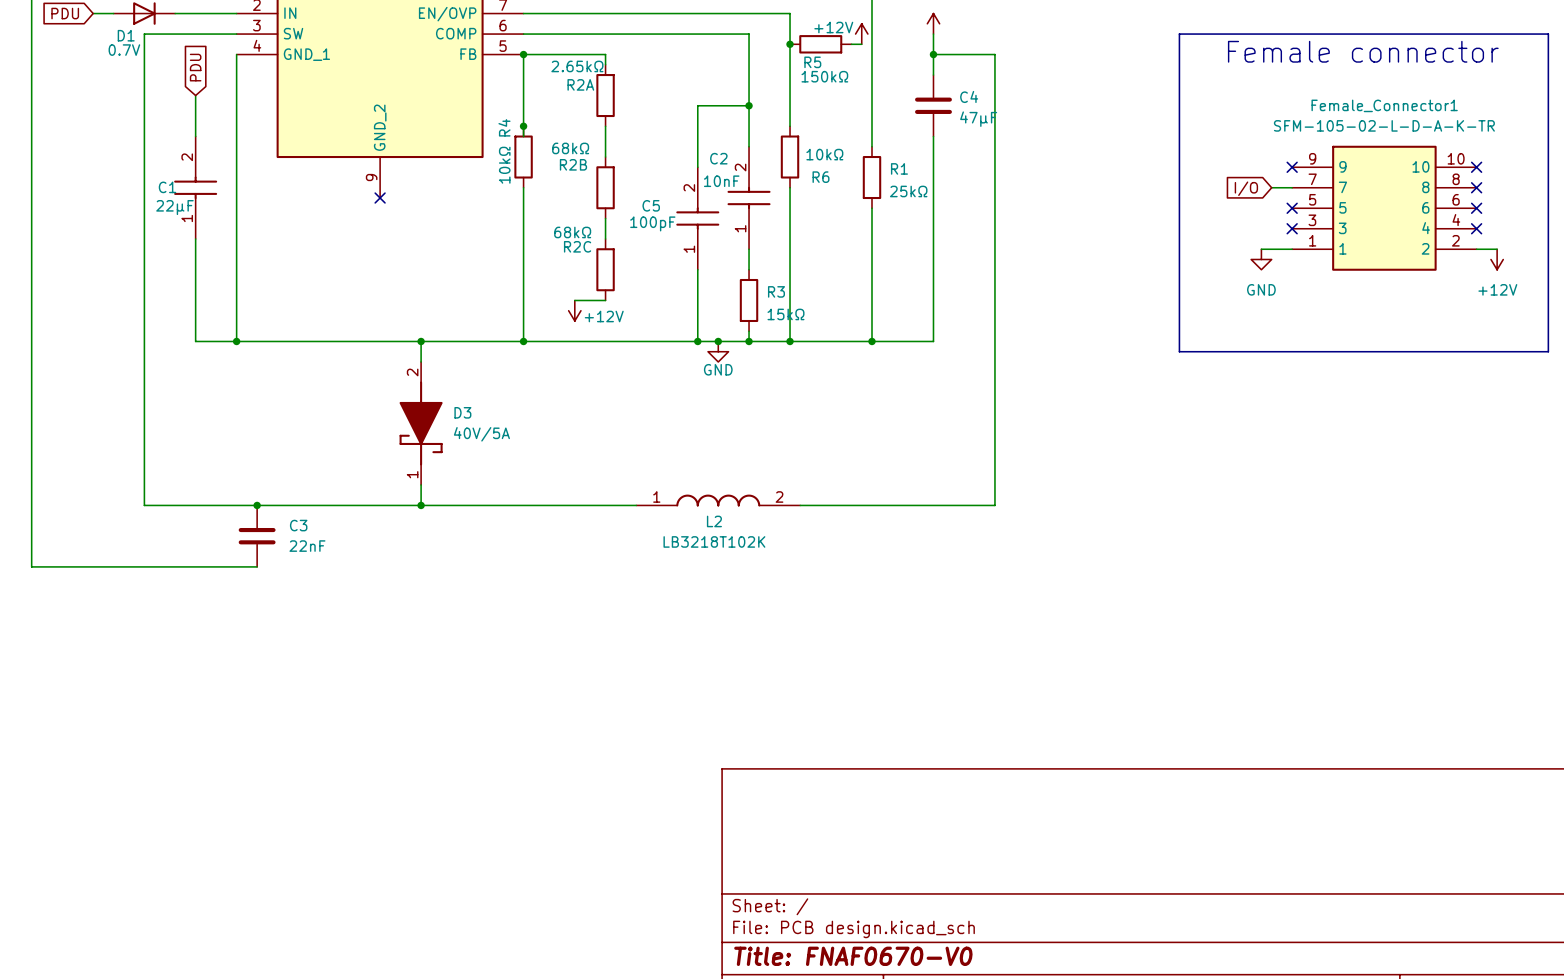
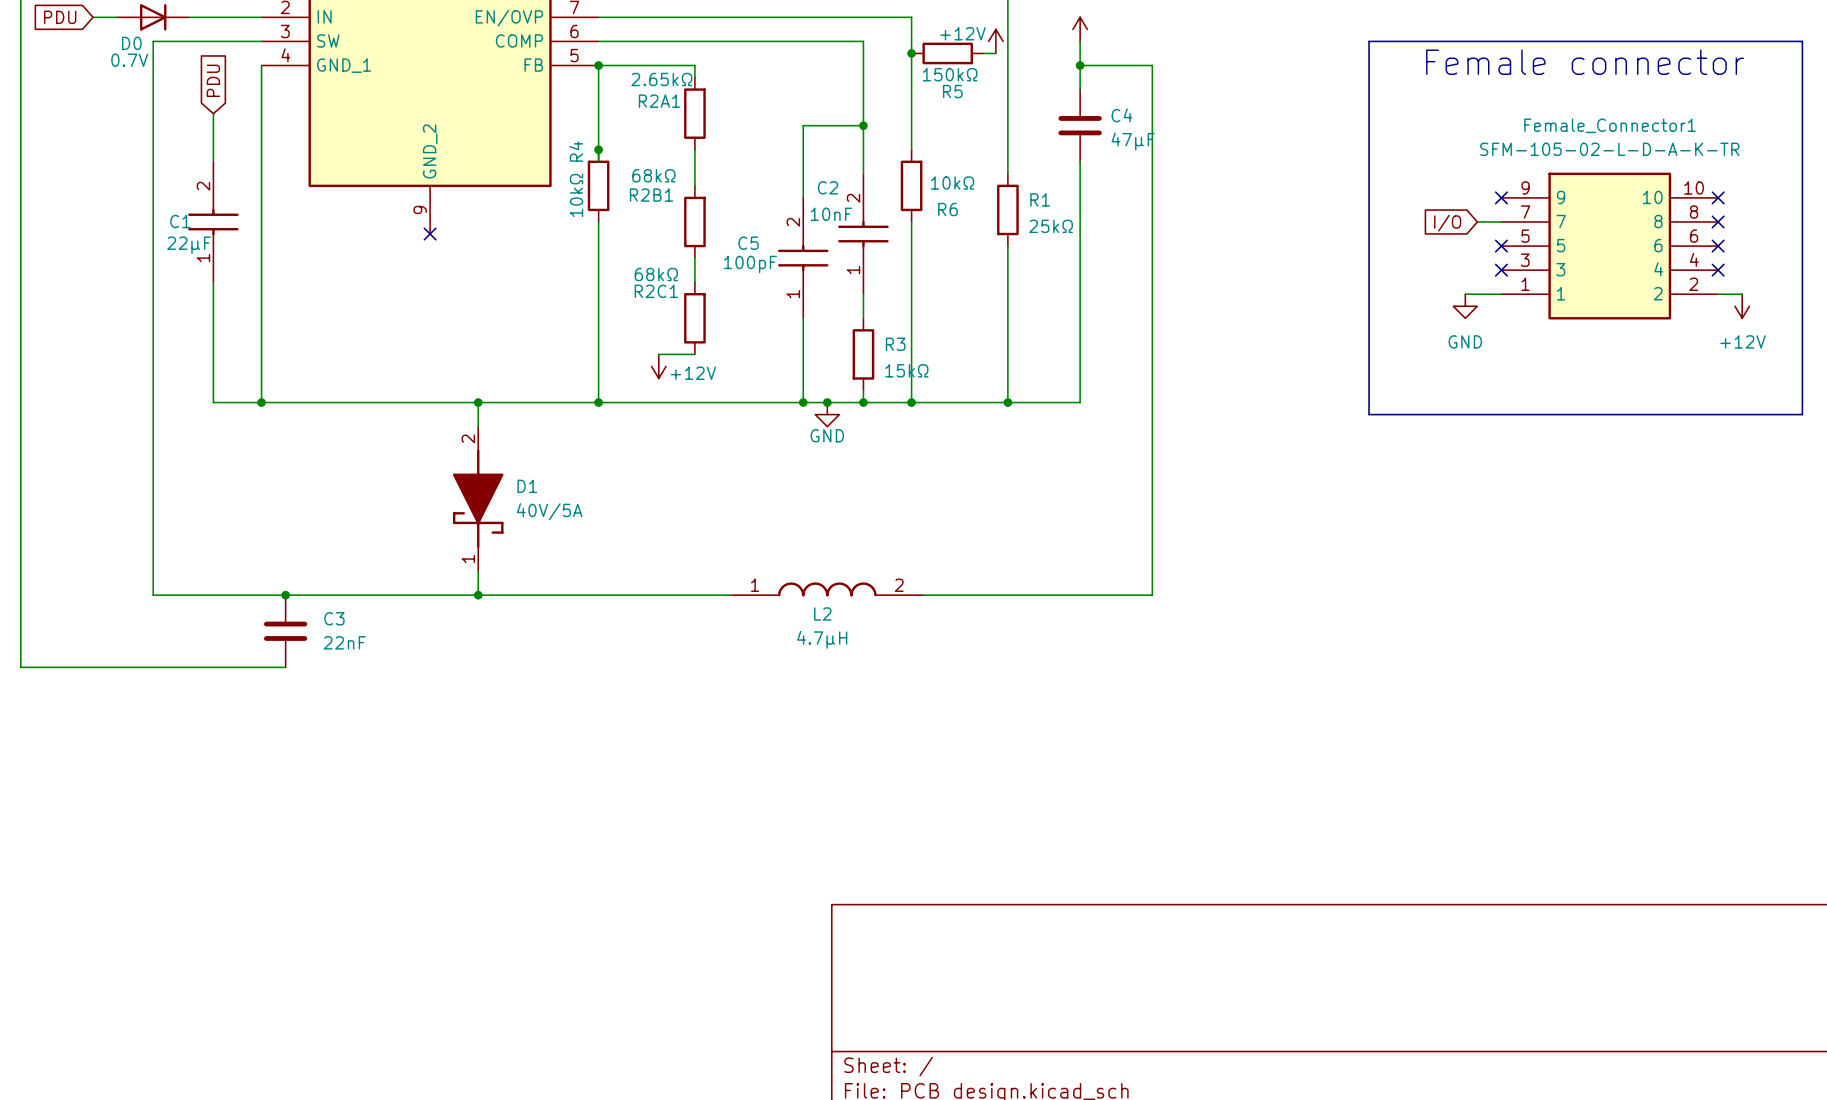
D1 name: D1 (126, 35) -> D0 (131, 43)
150kΩ value: R5 (812, 62) -> 150kΩ (950, 74)
150kΩ name: 150kΩ (824, 76) -> R5 (952, 91)
R2A name: R2A (580, 84) -> R2A1 (659, 101)
R2B name: R2B (573, 164) -> R2B1 (651, 195)
R2C name: R2C (577, 246) -> R2C1 (656, 291)
D3 name: D3 (462, 412) -> D1 (527, 486)
L2 value: LB3218T102K (714, 541) -> 4.7µH (822, 639)

